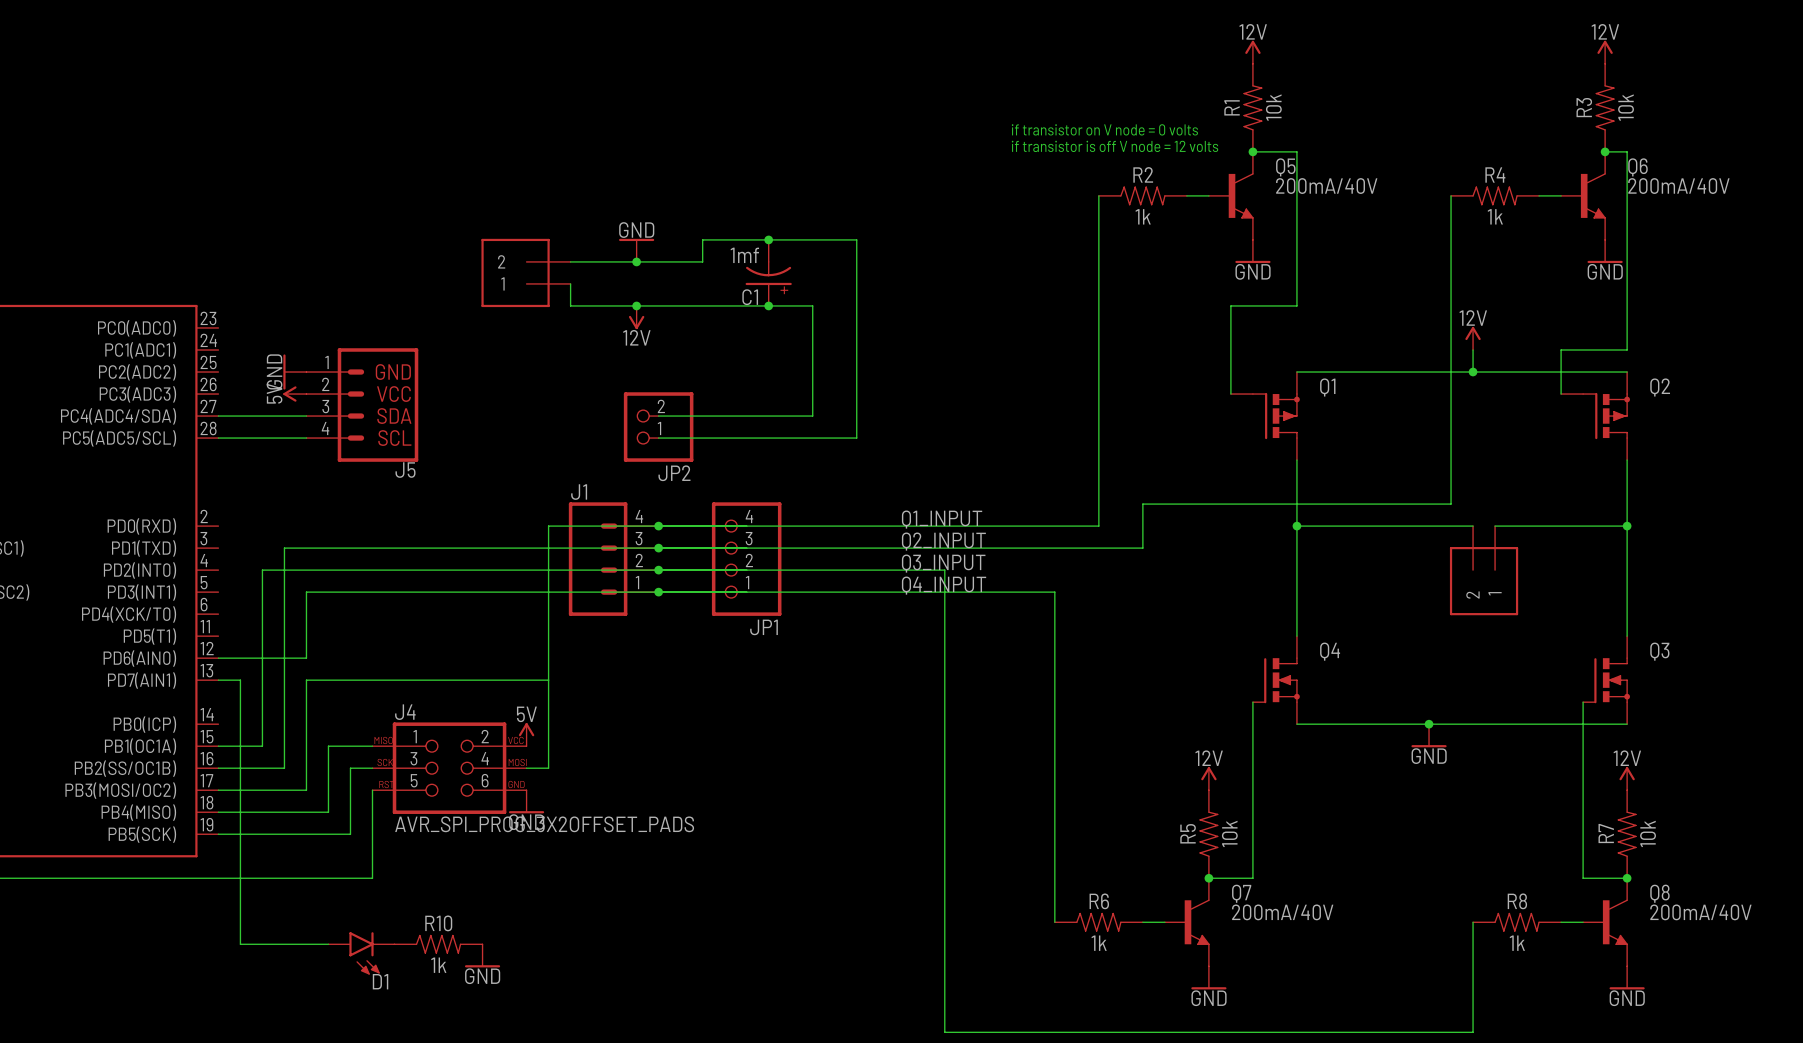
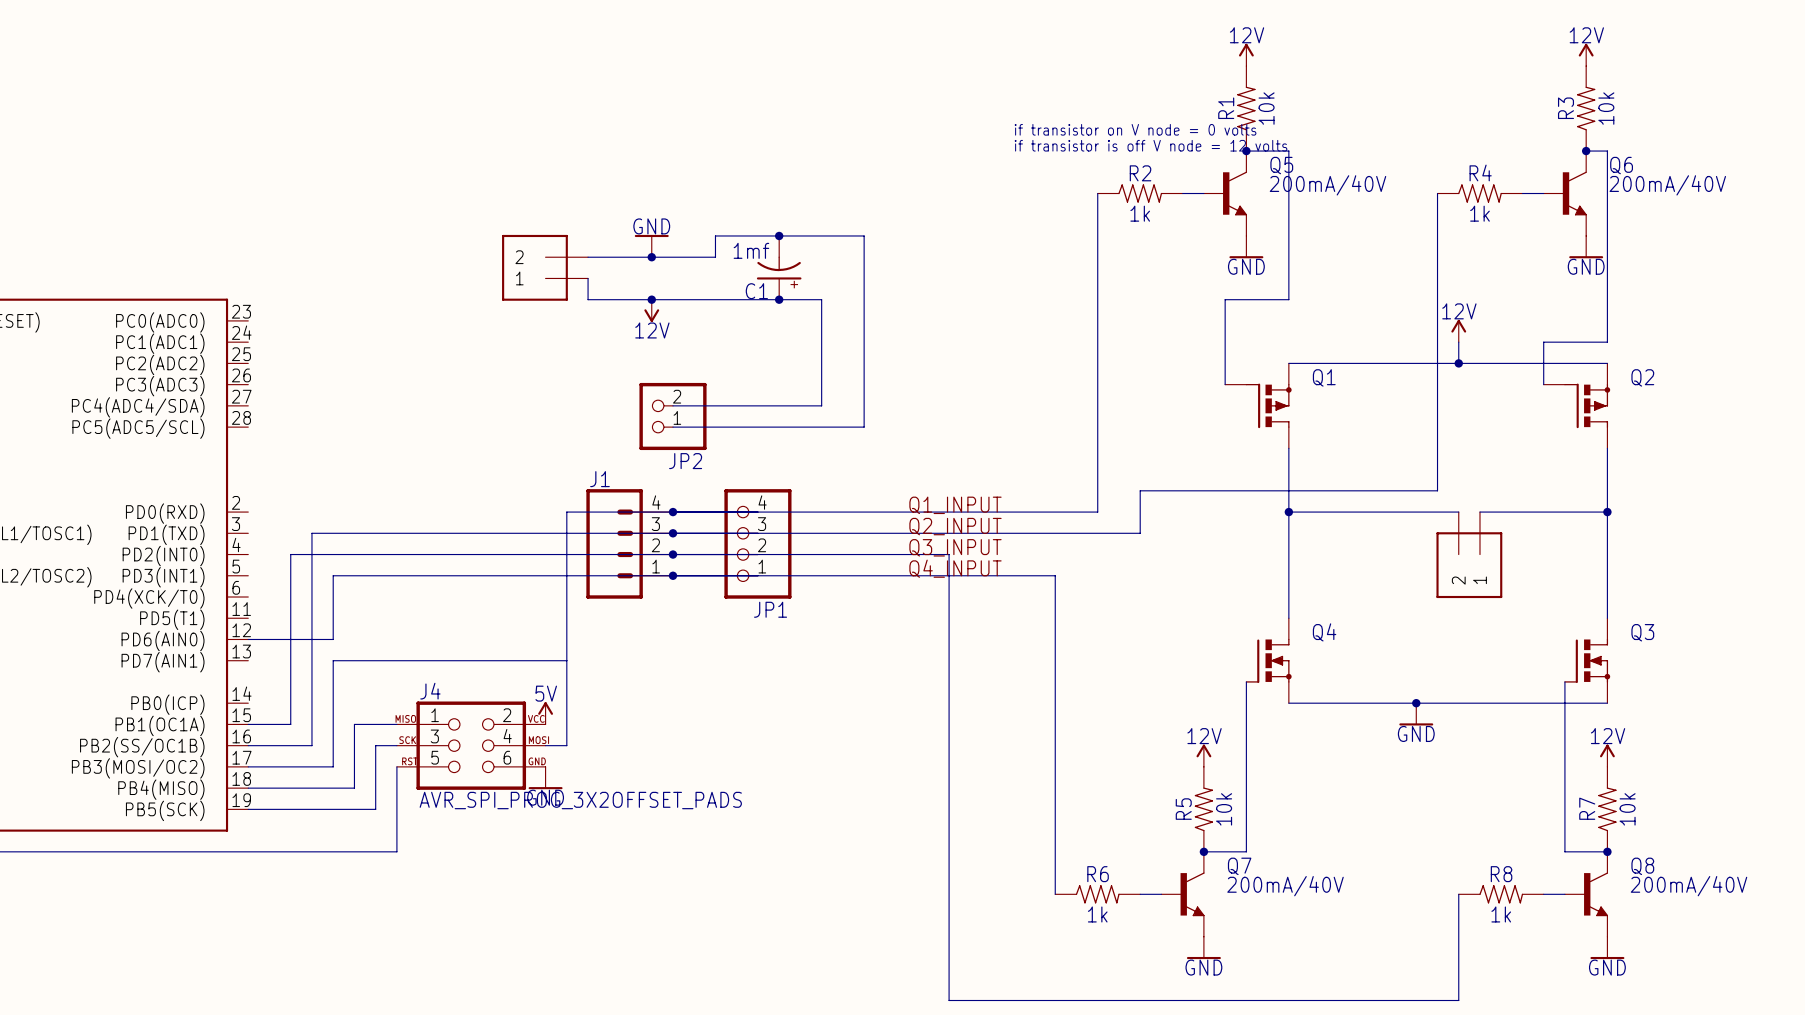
power symbol: GND (294, 372) -> none
power symbol: 5V (294, 394) -> none
J5: (362, 405) -> none
wire: (218, 416) (306, 416) -> none
wire: (218, 438) (306, 438) -> none
wire: (218, 680) (240, 680) (240, 944) (328, 944) -> none
R10: 1k (438, 944) -> none
D1: (361, 953) -> none
power symbol: GND (482, 955) -> none

